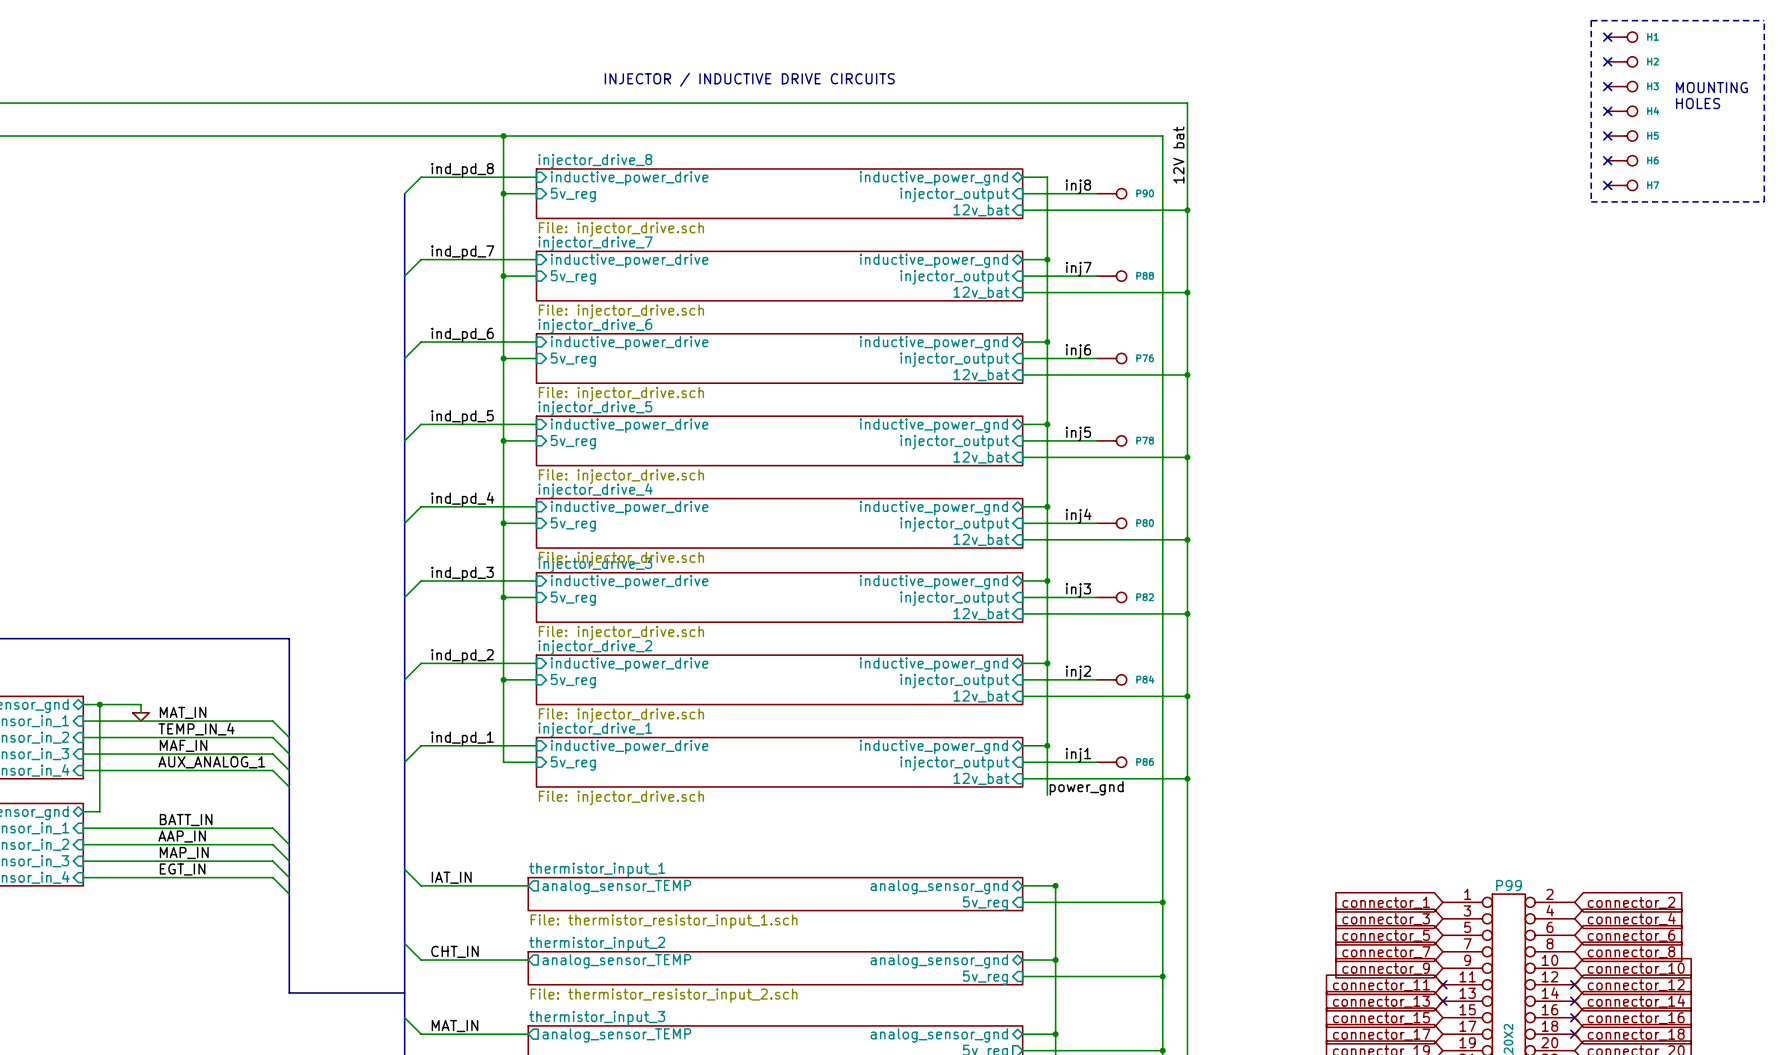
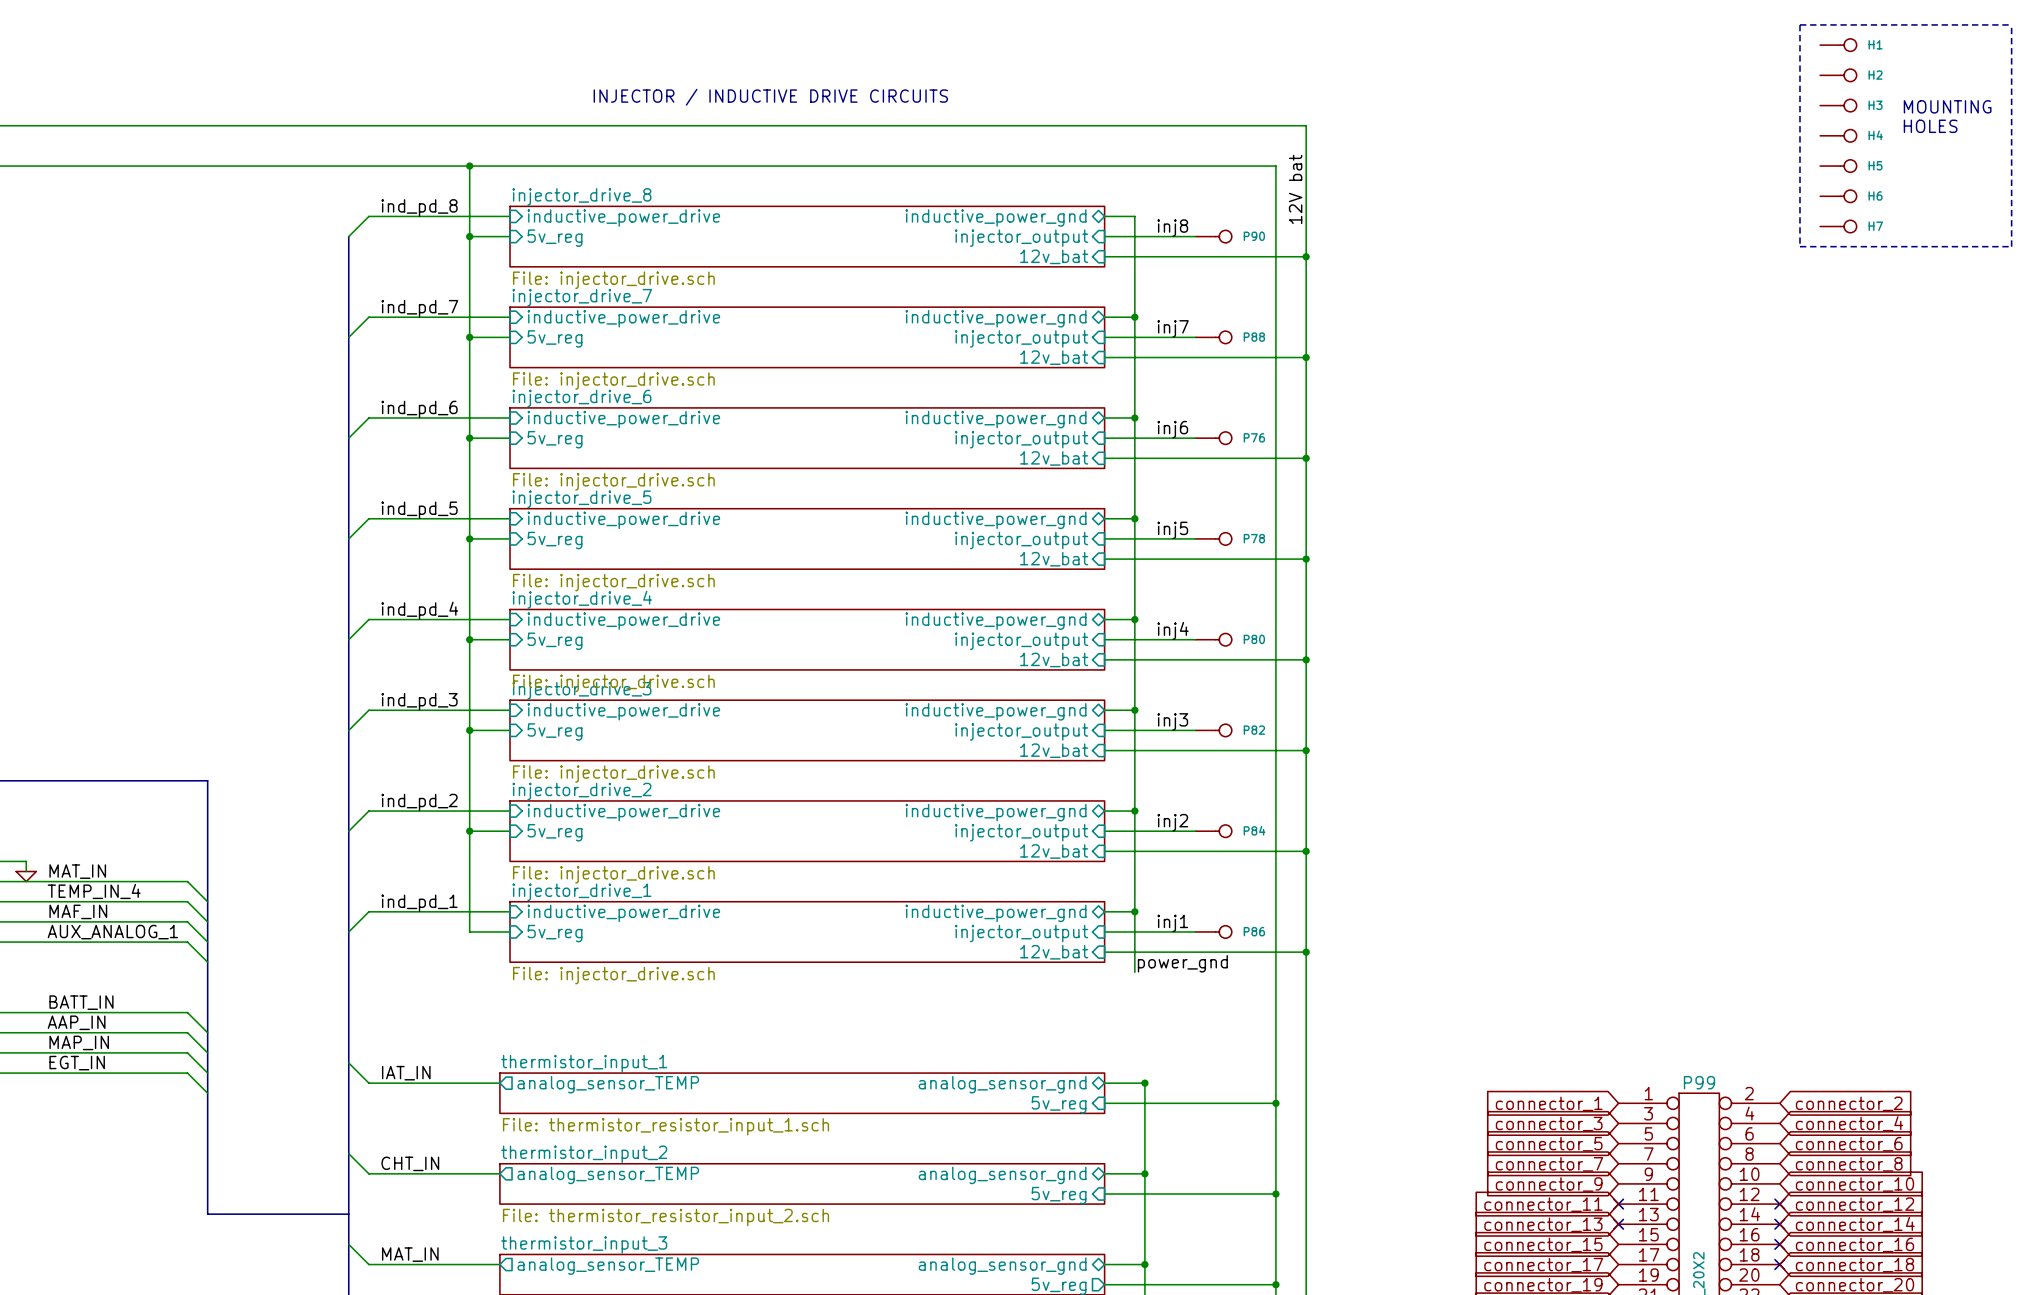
no-connect mark: (1607, 37) -> none
no-connect mark: (1607, 61) -> none
no-connect mark: (1607, 86) -> none
no-connect mark: (1607, 111) -> none
no-connect mark: (1607, 136) -> none
no-connect mark: (1607, 160) -> none
no-connect mark: (1607, 185) -> none

